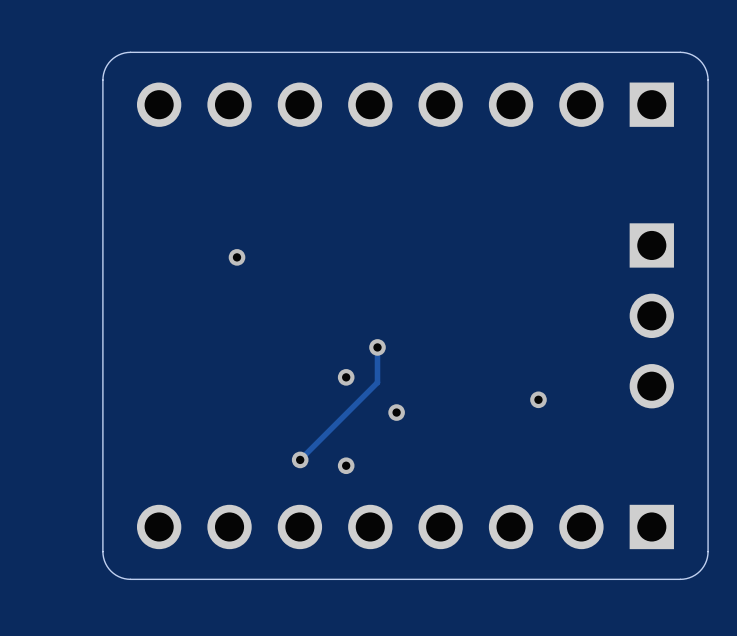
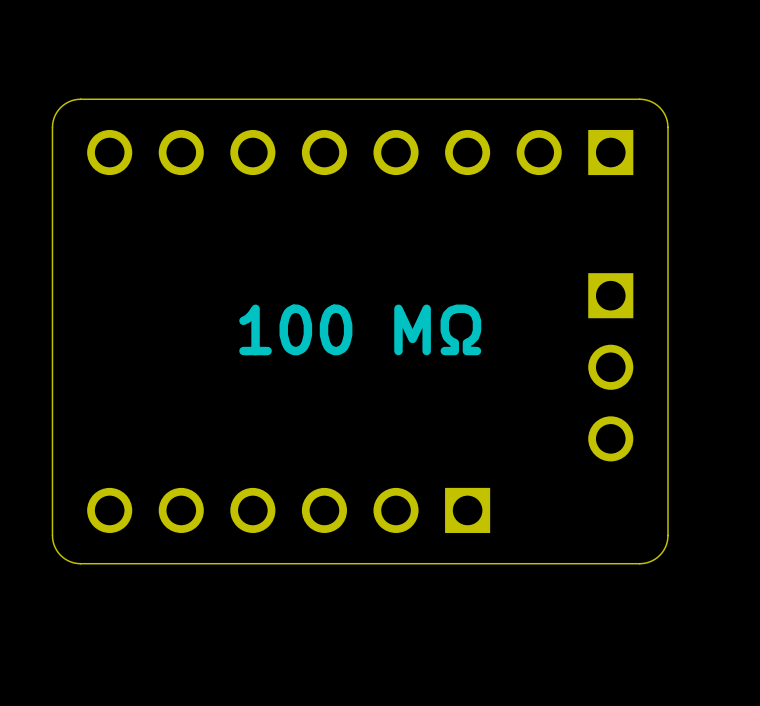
via: (237, 257) -> none
text: none -> 100 MΩ (360, 329)
track: (377, 347) (377, 382) (300, 459) -> none
via: (377, 347) -> none
via: (346, 377) -> none
via: (538, 399) -> none
via: (396, 412) -> none
part: none -> (288, 510)
via: (300, 459) -> none
via: (346, 465) -> none
board edge: (708, 481) (707, 557) (703, 566) (697, 573) (689, 577) (680, 579) (127, 579) (118, 576) (111, 571) (103, 557) (102, 481) -> (667, 535) (665, 547) (659, 555) (652, 560) (639, 563) (80, 563) (71, 562) (60, 555) (55, 547) (52, 535)
part: (405, 526) -> none

